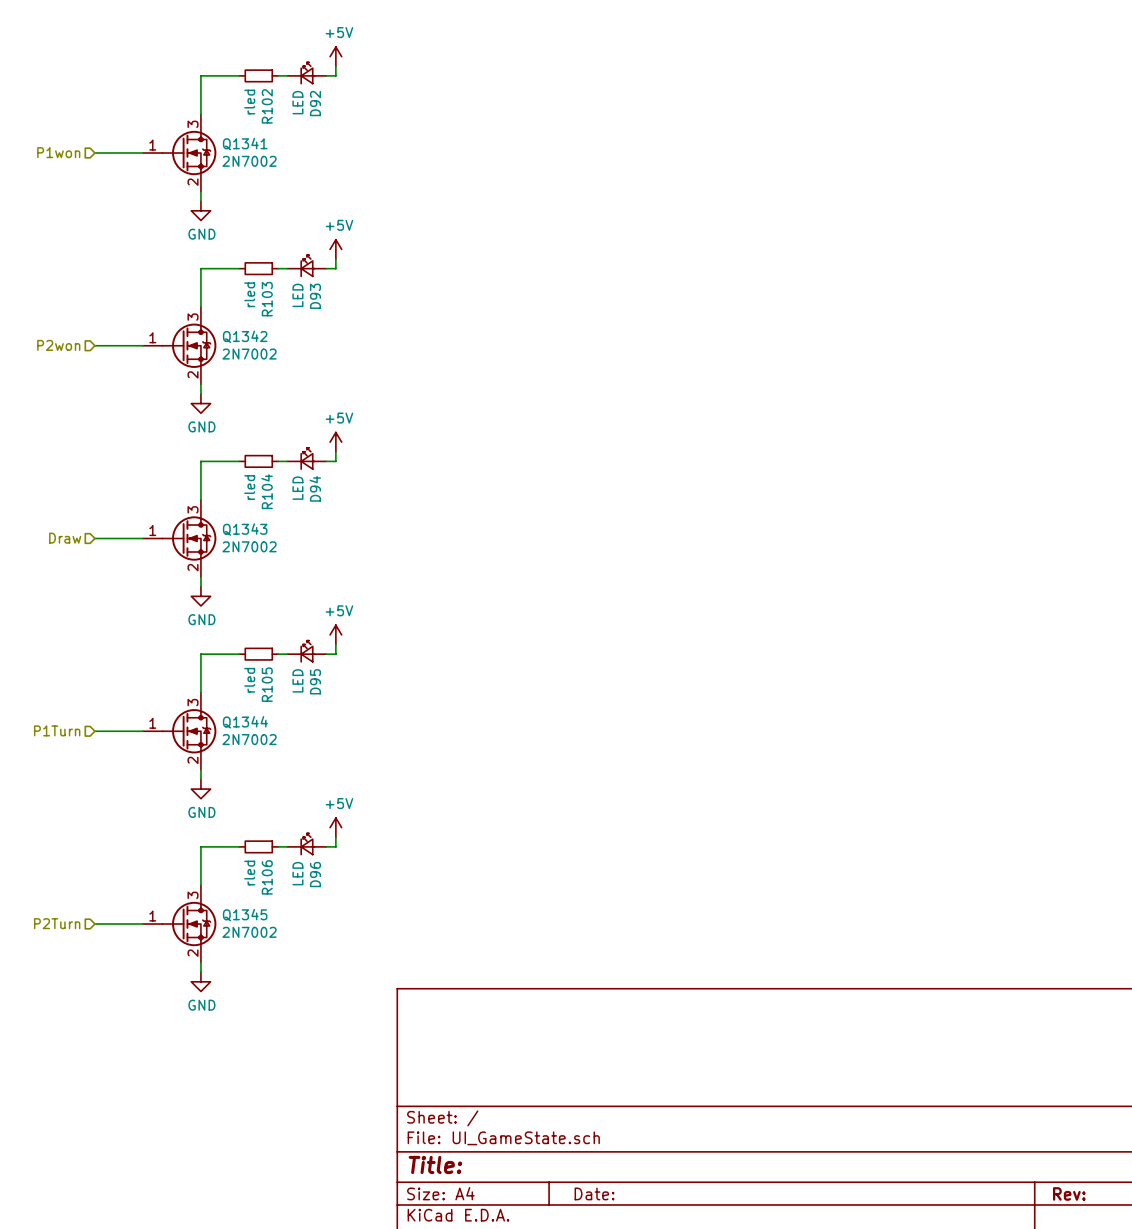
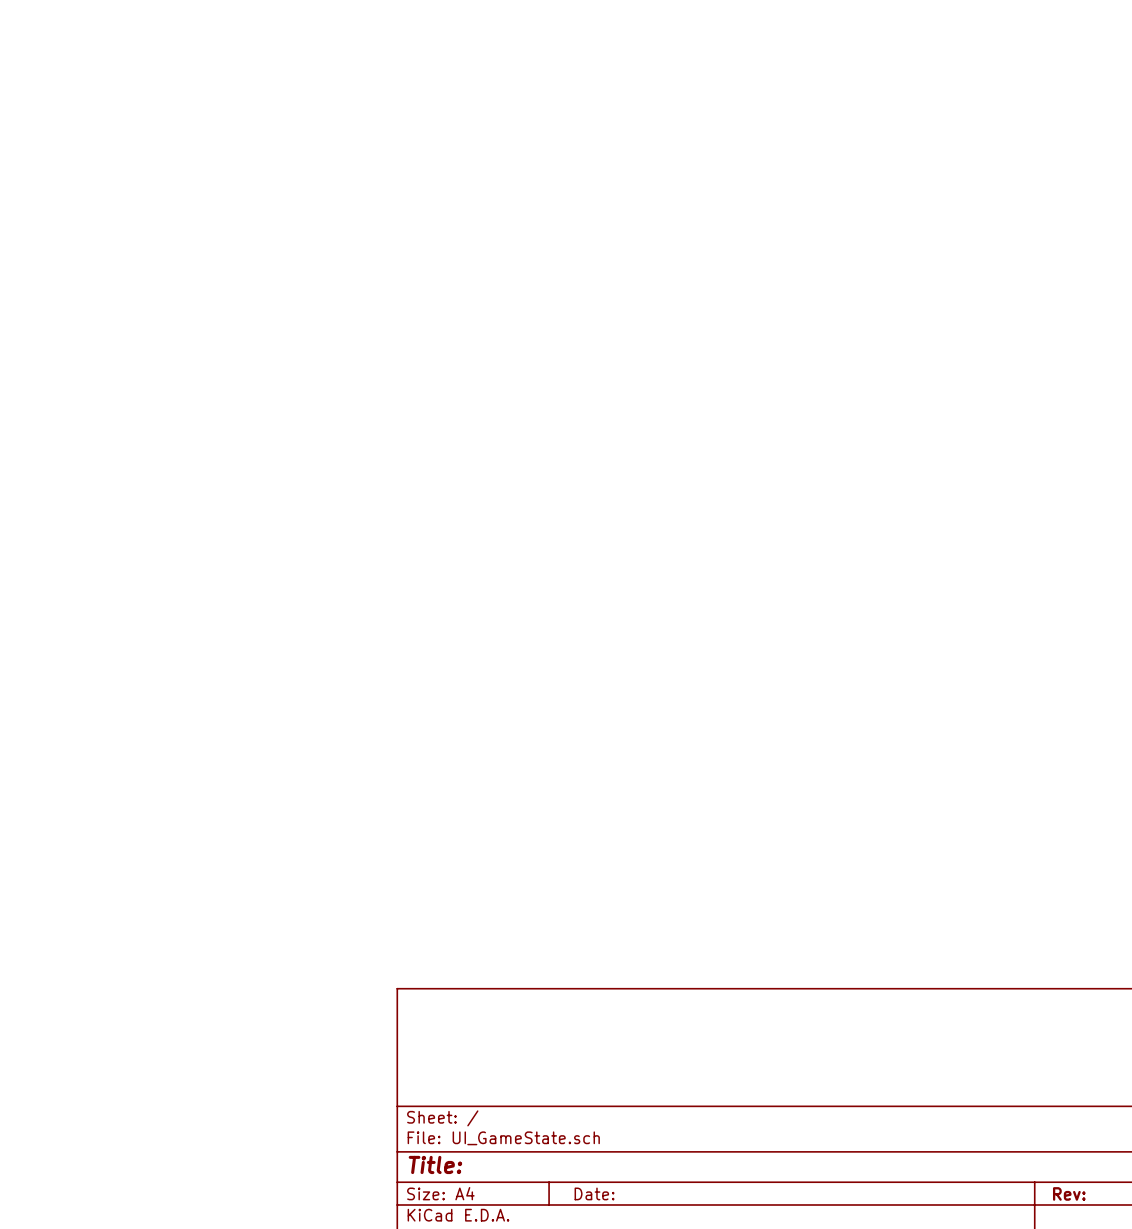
power symbol: +5V (335, 56) -> none
wire: (335, 66) (335, 75) (326, 75) -> none
D92: LED (306, 73) -> none
wire: (239, 75) (200, 75) (200, 114) -> none
R102: rled (258, 75) -> none
wire: (278, 75) (287, 75) -> none
hierarchical label: P1won (58, 152) -> none
wire: (94, 153) (143, 153) -> none
Q1341: 2N7002 (179, 153) -> none
wire: (200, 191) (200, 201) -> none
power symbol: GND (200, 210) -> none
power symbol: +5V (335, 249) -> none
wire: (335, 259) (335, 268) (326, 268) -> none
D93: LED (306, 265) -> none
wire: (239, 268) (200, 268) (200, 307) -> none
R103: rled (258, 268) -> none
wire: (278, 268) (287, 268) -> none
hierarchical label: P2won (58, 345) -> none
wire: (94, 345) (143, 345) -> none
Q1342: 2N7002 (179, 345) -> none
wire: (200, 384) (200, 393) -> none
power symbol: GND (200, 403) -> none
power symbol: +5V (335, 442) -> none
wire: (335, 451) (335, 461) (326, 461) -> none
D94: LED (306, 458) -> none
wire: (239, 461) (200, 461) (200, 499) -> none
R104: rled (258, 461) -> none
wire: (278, 461) (287, 461) -> none
hierarchical label: Draw (65, 538) -> none
wire: (94, 538) (143, 538) -> none
Q1343: 2N7002 (179, 538) -> none
wire: (200, 577) (200, 586) -> none
power symbol: GND (200, 596) -> none
power symbol: +5V (335, 634) -> none
wire: (335, 644) (335, 654) (326, 654) -> none
D95: LED (306, 651) -> none
wire: (239, 654) (200, 654) (200, 692) -> none
R105: rled (258, 654) -> none
wire: (278, 654) (287, 654) -> none
hierarchical label: P1Turn (57, 730) -> none
wire: (94, 731) (143, 731) -> none
Q1344: 2N7002 (179, 731) -> none
wire: (200, 769) (200, 779) -> none
power symbol: GND (200, 789) -> none
power symbol: +5V (335, 827) -> none
wire: (335, 837) (335, 846) (326, 846) -> none
D96: LED (306, 844) -> none
wire: (239, 846) (200, 846) (200, 885) -> none
R106: rled (258, 846) -> none
wire: (278, 846) (287, 846) -> none
hierarchical label: P2Turn (57, 923) -> none
wire: (94, 924) (143, 924) -> none
Q1345: 2N7002 (179, 924) -> none
wire: (200, 962) (200, 972) -> none
power symbol: GND (200, 981) -> none

